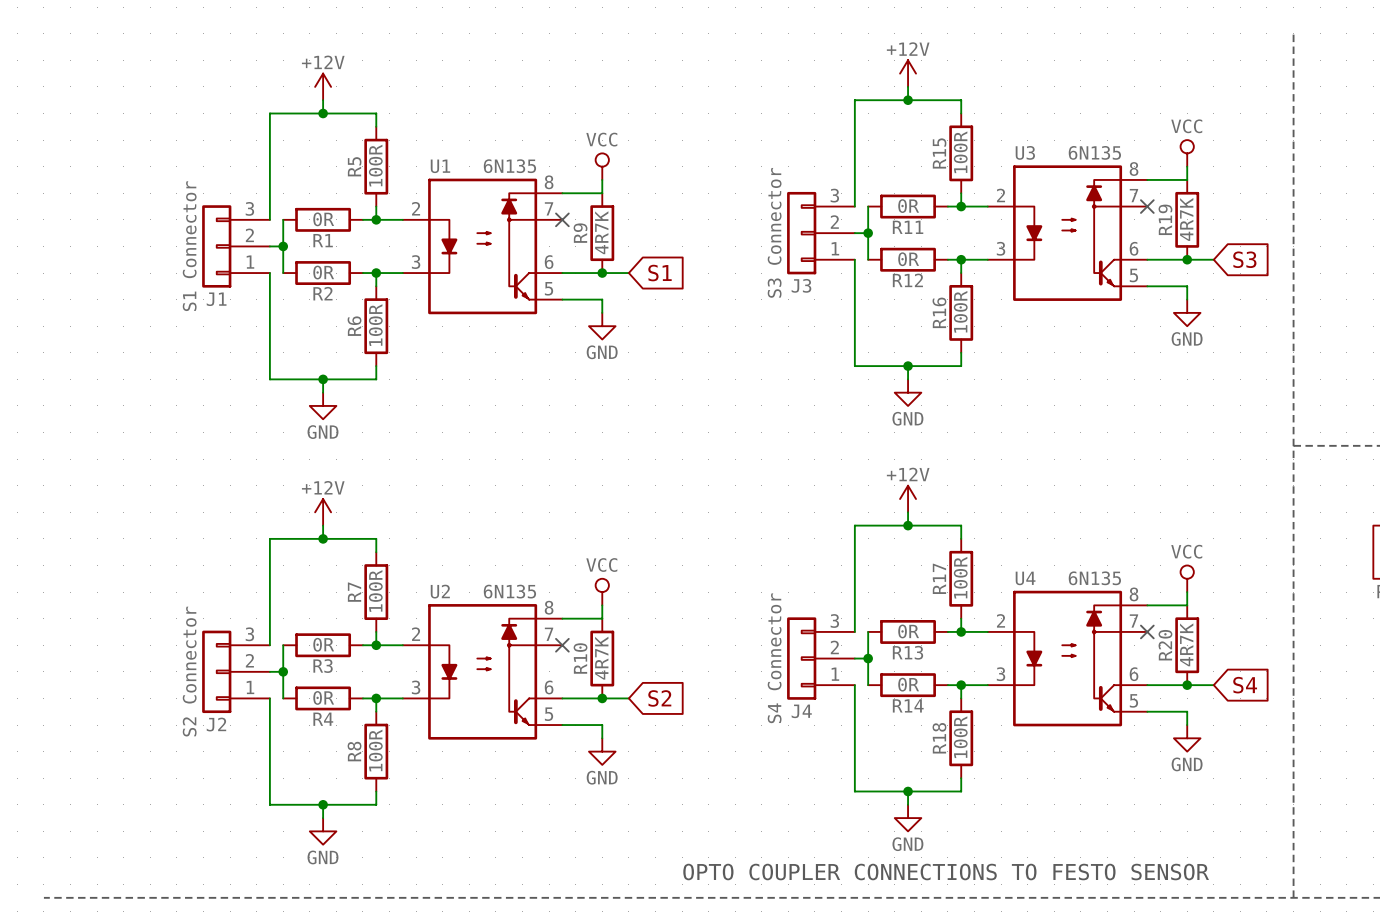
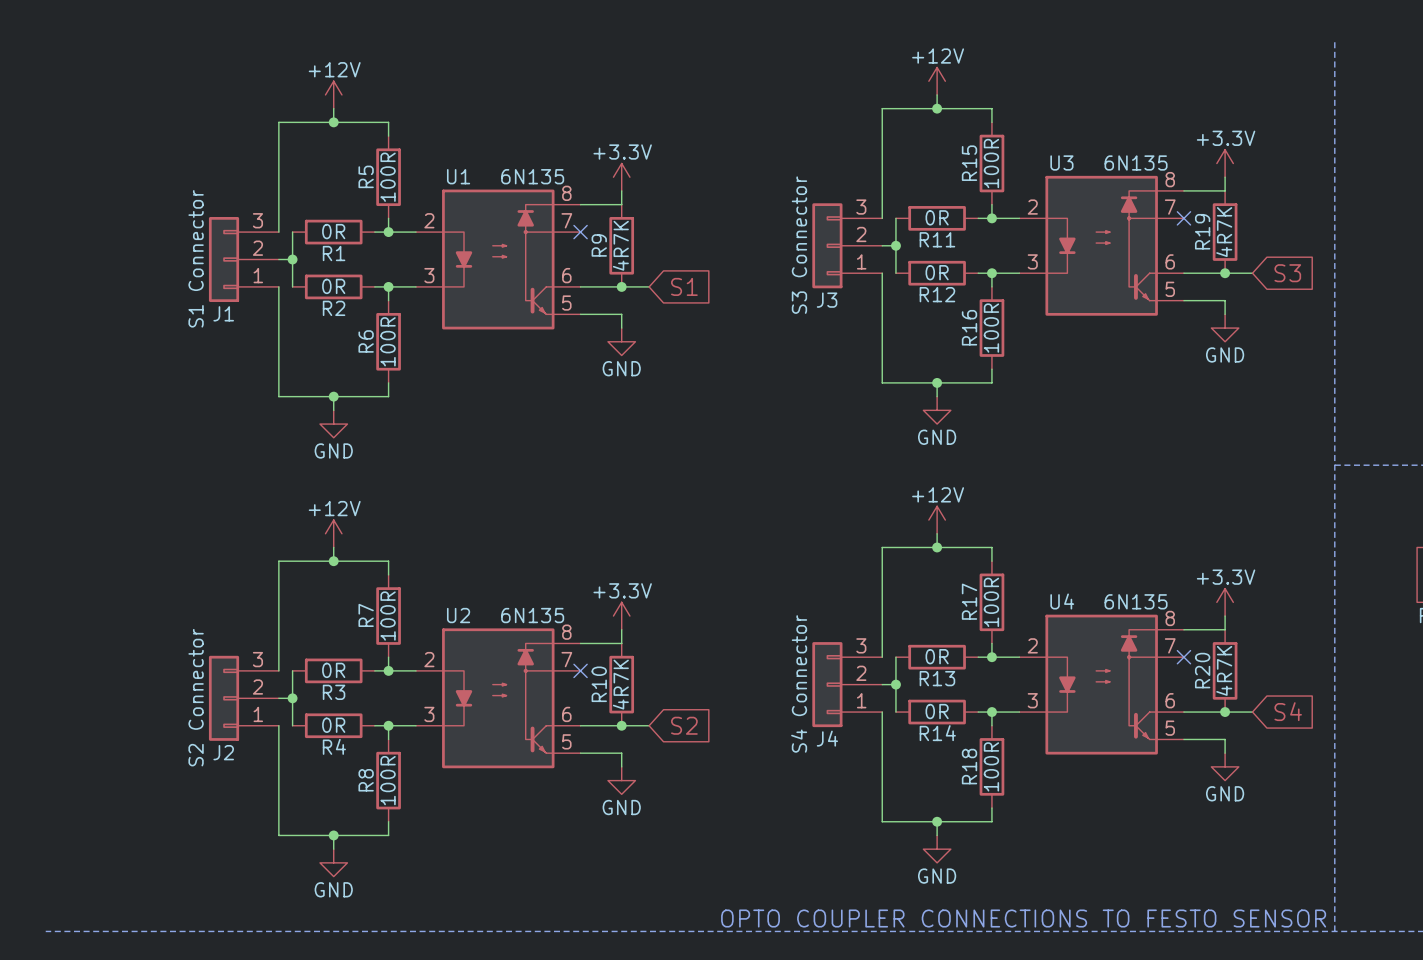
power symbol: VCC (1187, 153) -> +3.3V (1225, 163)
power symbol: VCC (602, 166) -> +3.3V (621, 177)
power symbol: VCC (1187, 578) -> +3.3V (1225, 602)
power symbol: VCC (602, 592) -> +3.3V (621, 616)
text position: OPTO COUPLER CONNECTIONS TO FESTO SENSOR (946, 872) -> OPTO COUPLER CONNECTIONS TO FESTO SENSOR (1023, 918)

